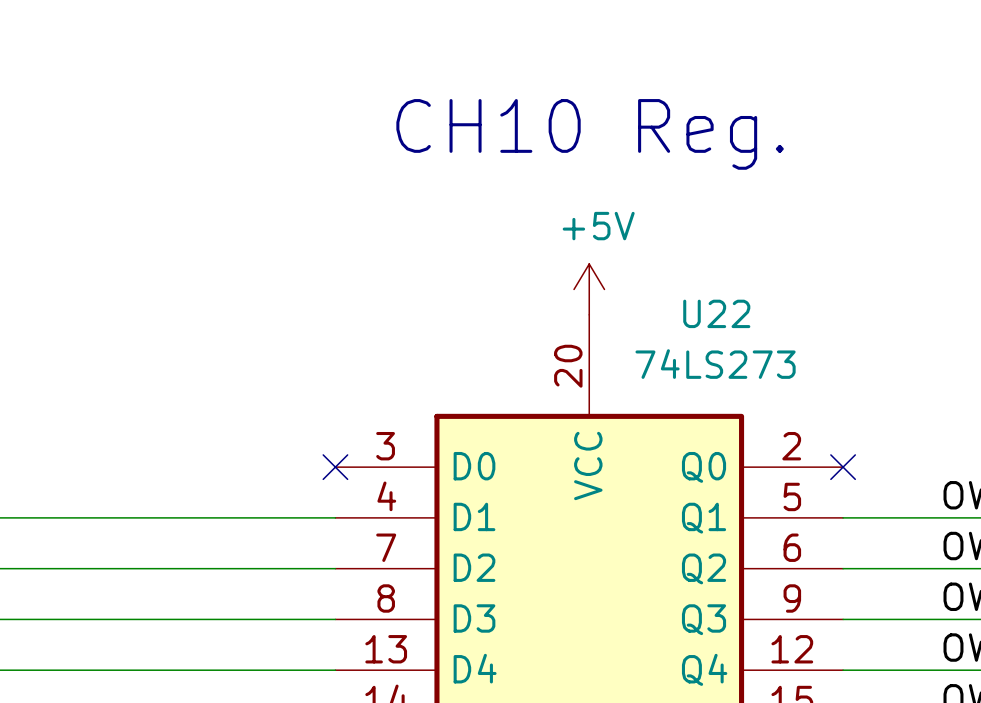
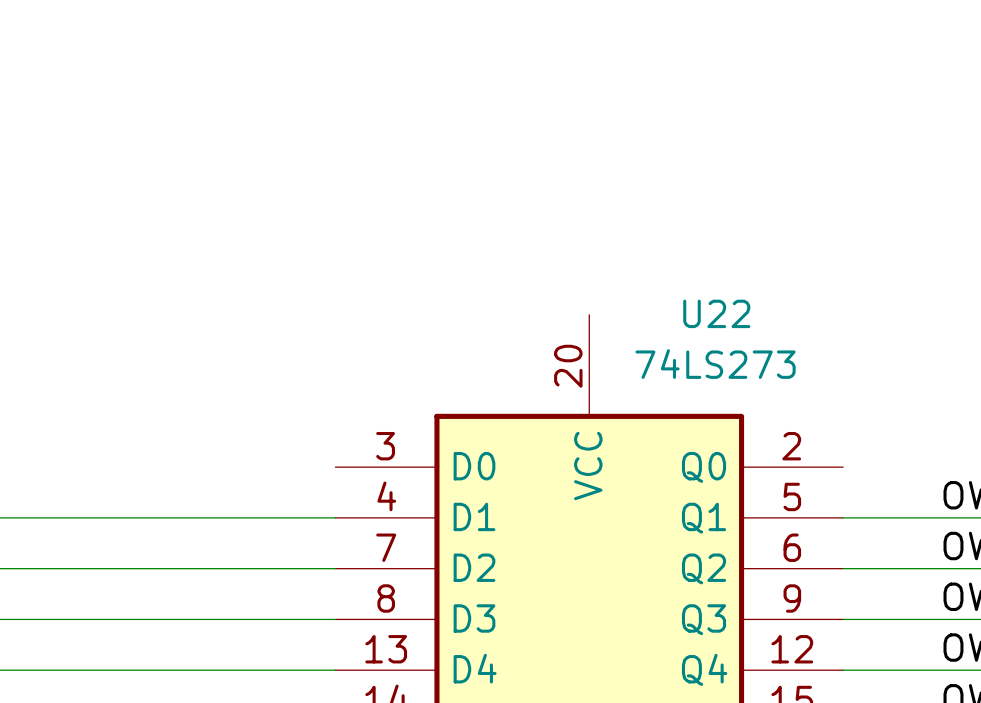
text: CH10 Reg. (590, 134) -> none
power symbol: +5V (589, 289) -> none
no-connect mark: (335, 467) -> none
no-connect mark: (843, 467) -> none

